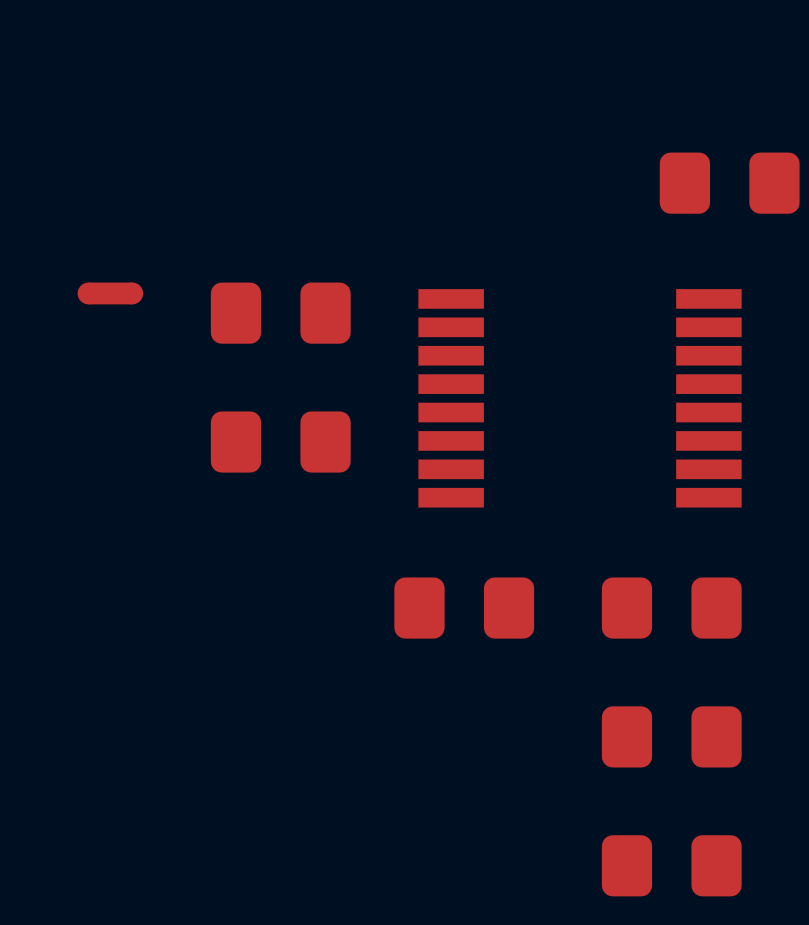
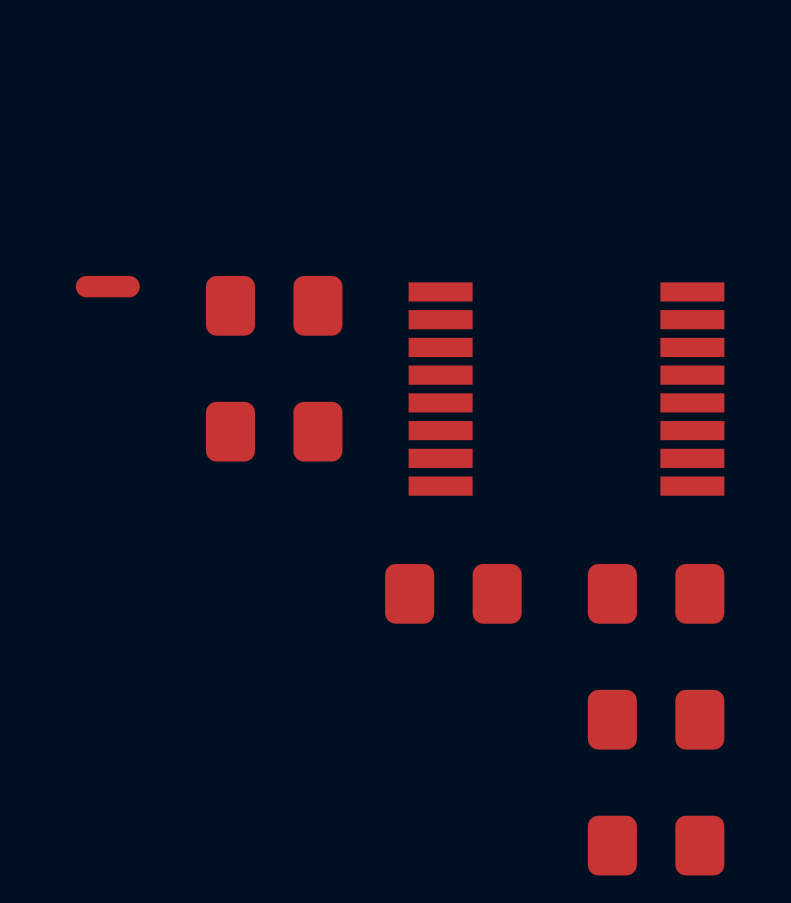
part: (729, 183) -> none

